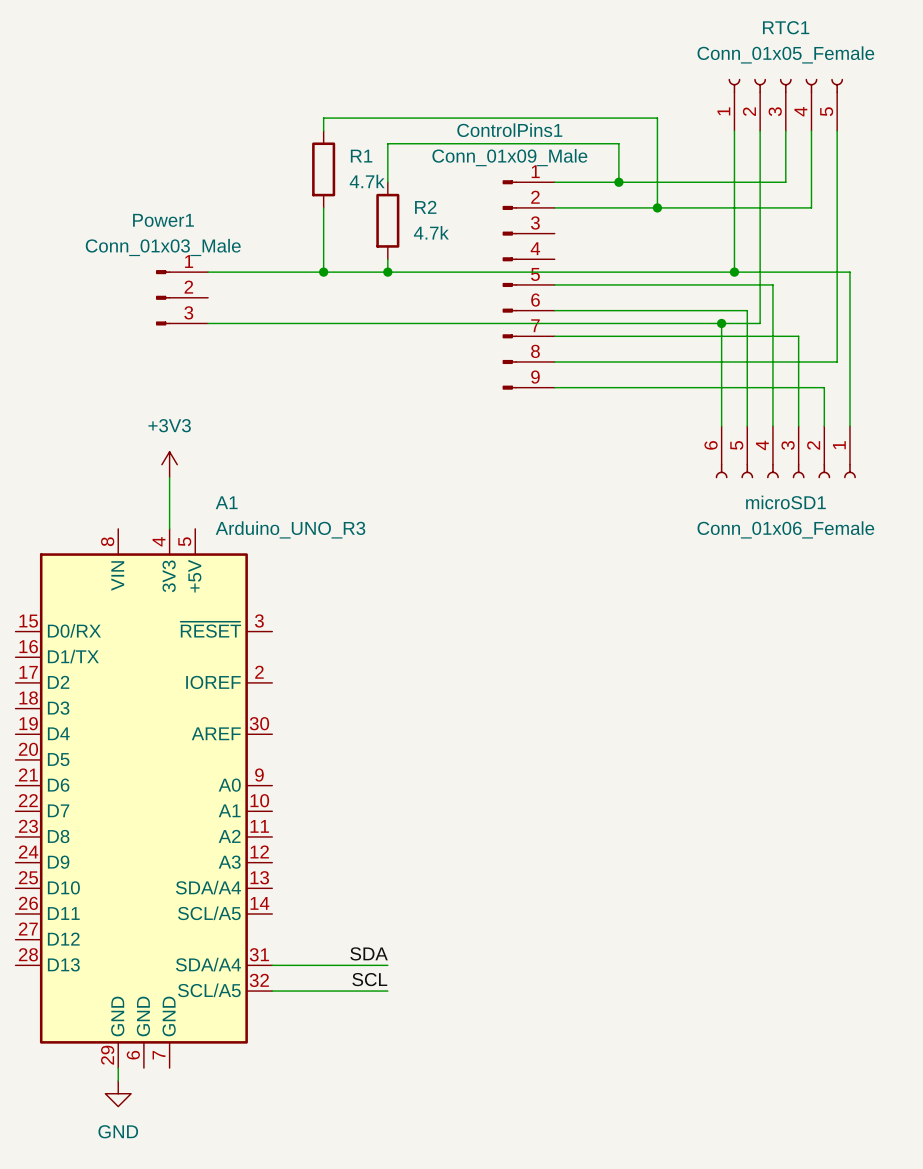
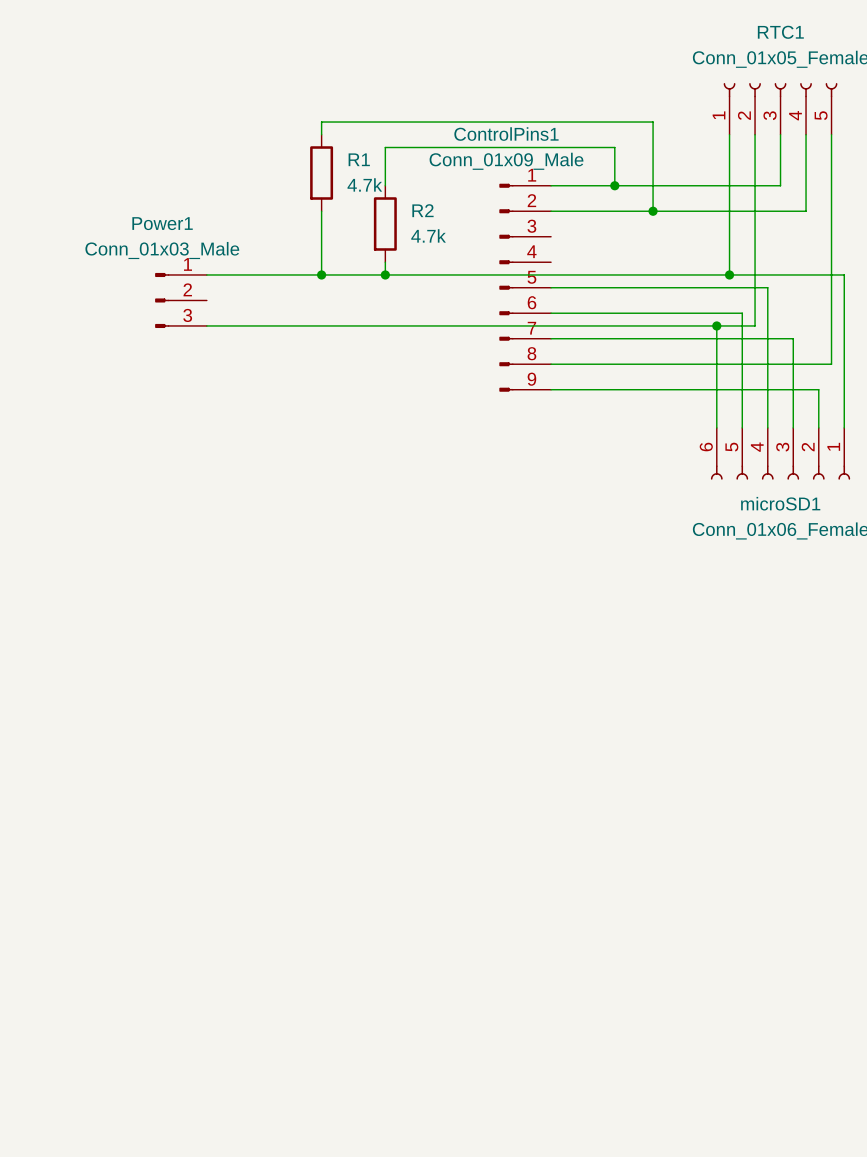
power symbol: +3V3 (169, 464) -> none
wire: (169, 477) (169, 528) -> none
A1: Arduino_UNO_R3 (143, 798) -> none
label: SDA (369, 953) -> none
wire: (272, 965) (387, 965) -> none
label: SCL (369, 979) -> none
wire: (272, 991) (387, 991) -> none
wire: (118, 1068) (118, 1080) -> none
power symbol: GND (118, 1093) -> none

